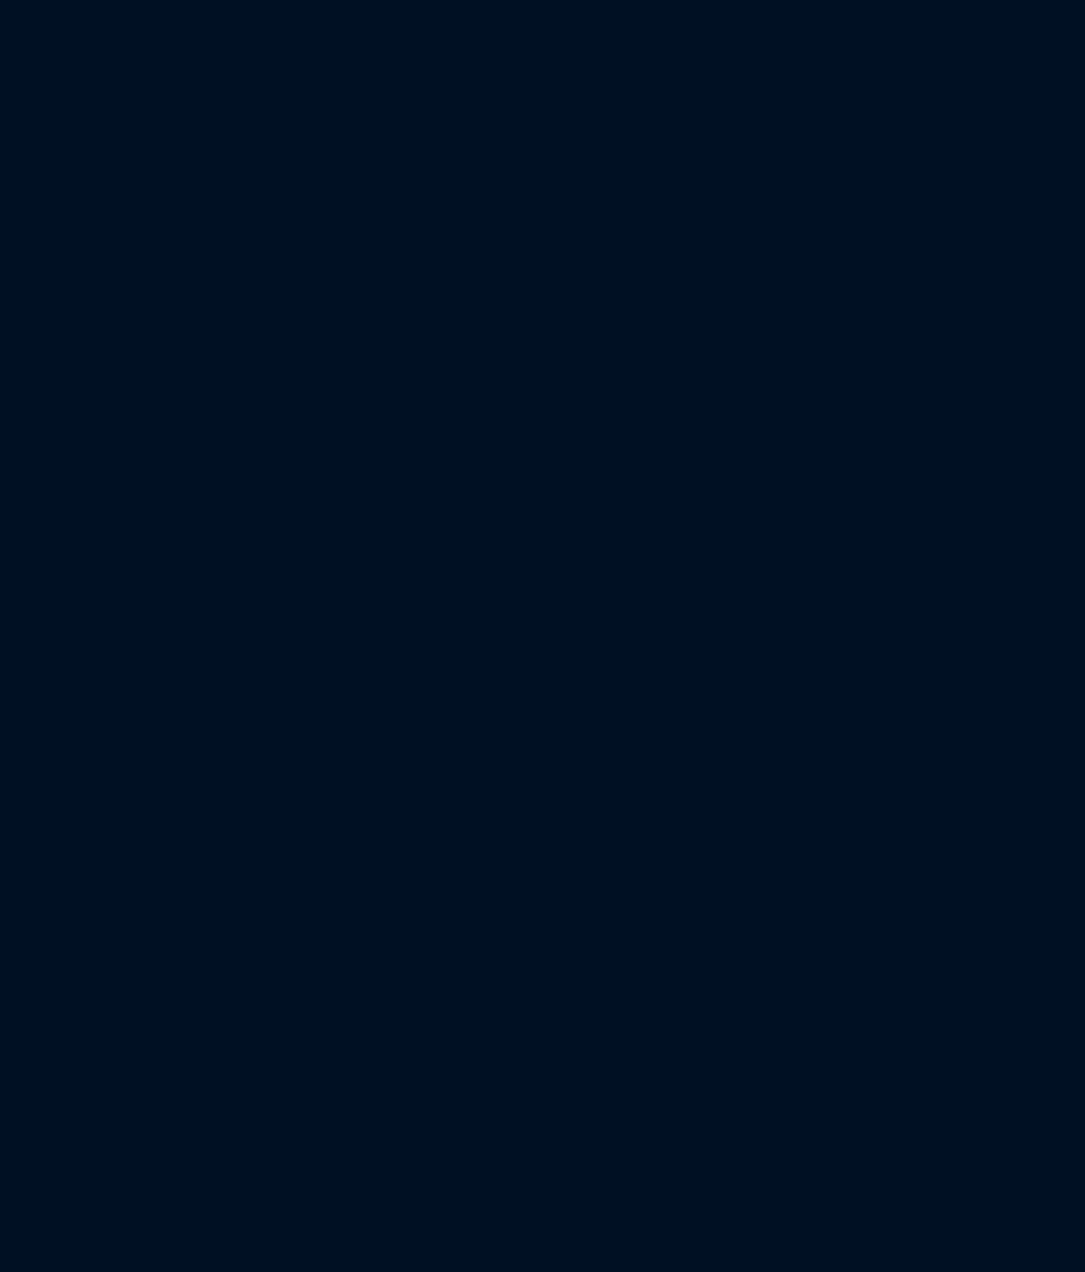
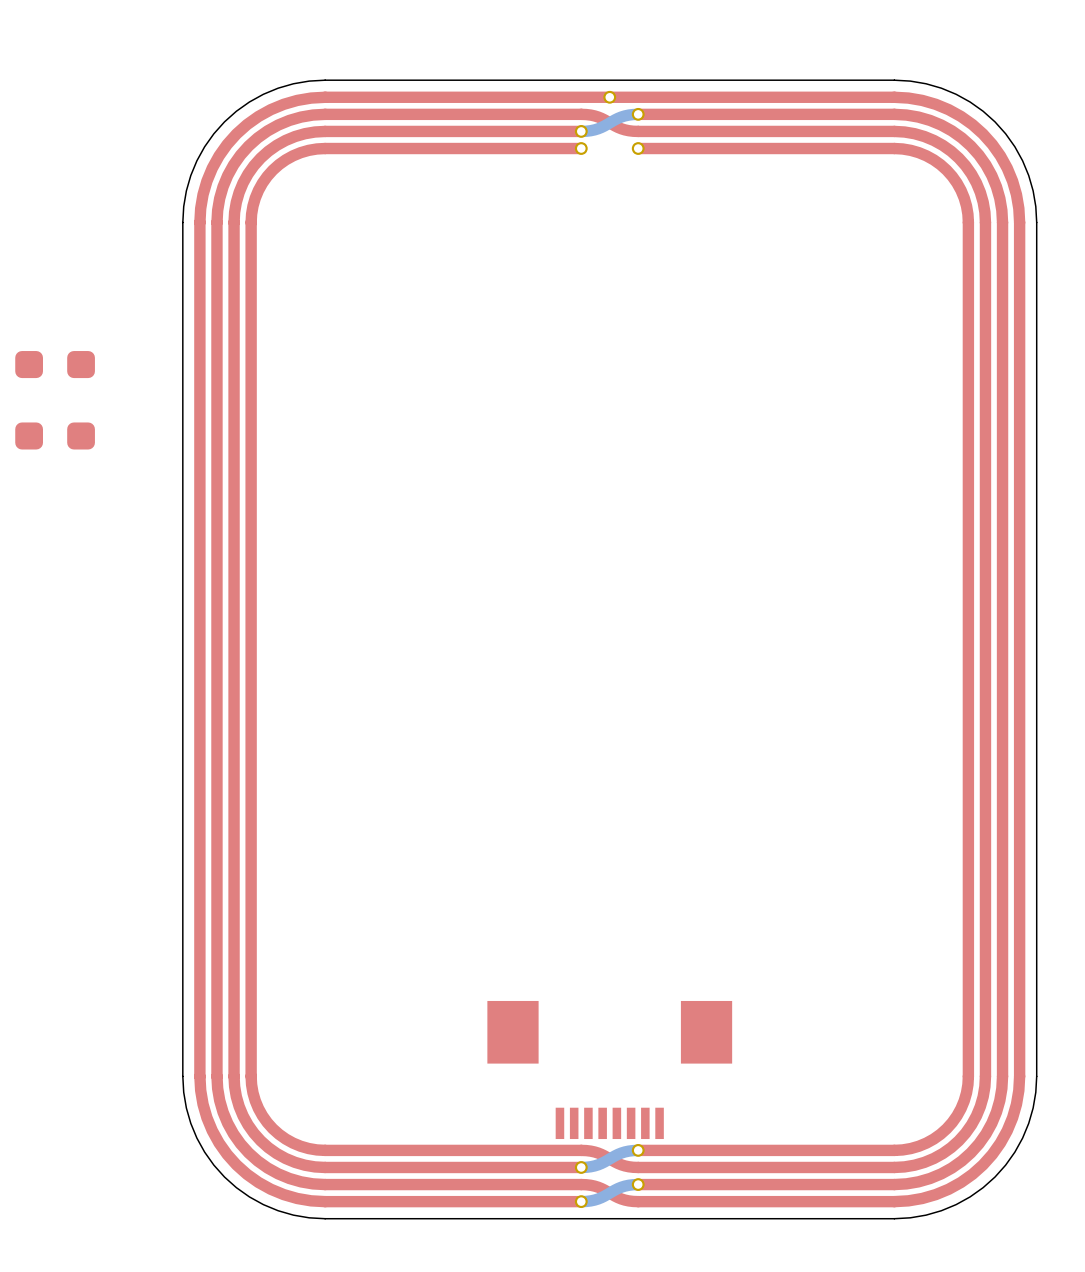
board edge: none -> (894, 80) (309, 81) (278, 88) (249, 102) (224, 121) (204, 146) (190, 175) (183, 206) (182, 222) (182, 1076) (183, 1092) (190, 1123) (204, 1152) (224, 1177) (249, 1196) (278, 1210) (309, 1217) (325, 1218) (910, 1217) (941, 1210) (970, 1196) (995, 1177) (1014, 1152) (1028, 1123) (1035, 1092) (1036, 1076) (1035, 206) (1028, 175) (1014, 146) (1005, 133) (983, 111) (970, 102) (941, 88) (910, 81) (894, 80)
part: none -> (55, 364)
part: none -> (55, 435)
part: none -> (609, 649)
part: none -> (609, 1069)

